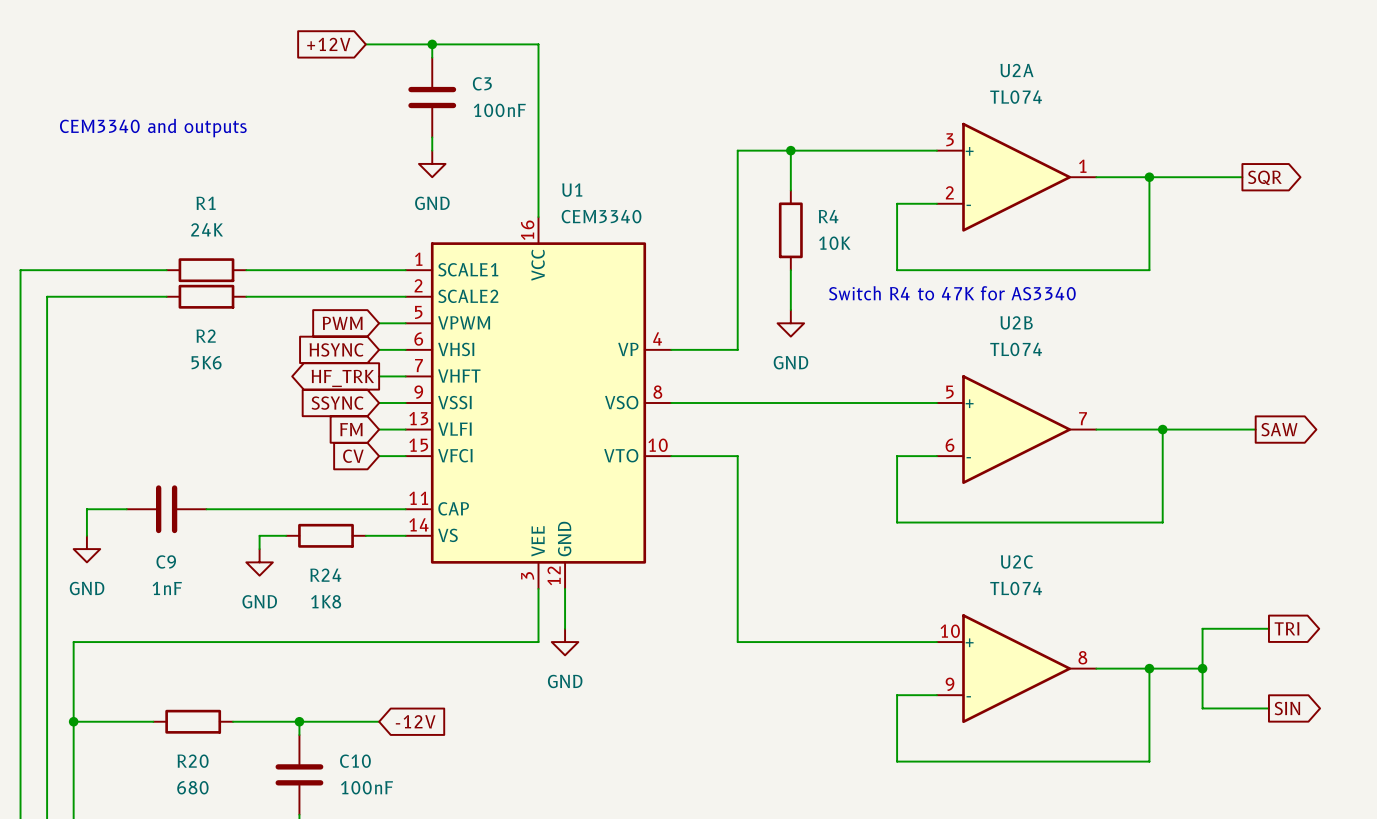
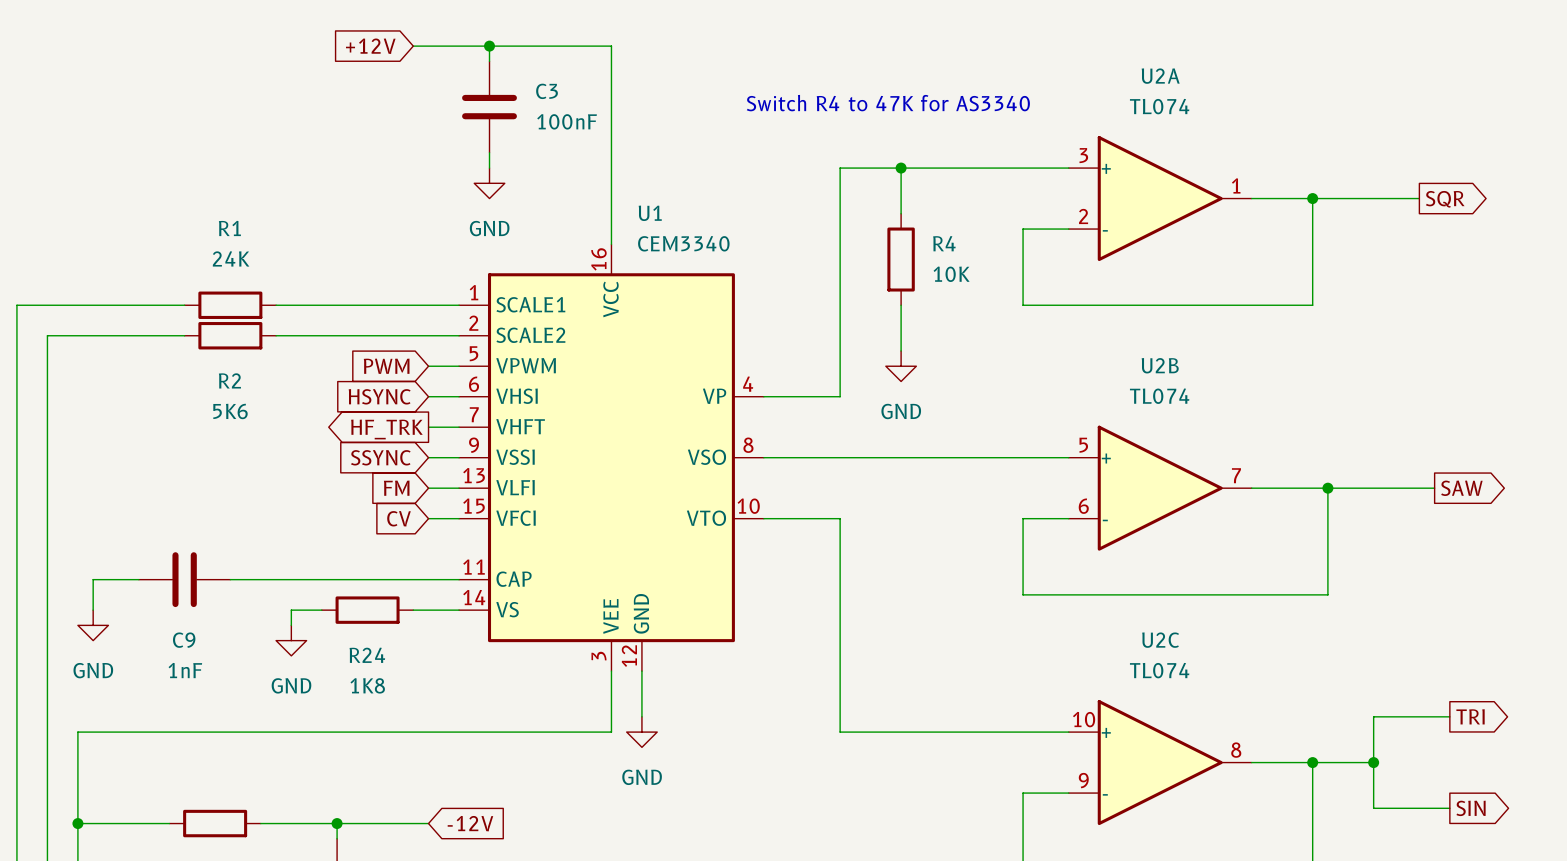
text: none -> Switch R4 to 47K for AS3340 (888, 103)
text: CEM3340 and outputs (153, 128) -> none
text: Switch R4 to 47K for AS3340 (952, 293) -> none

